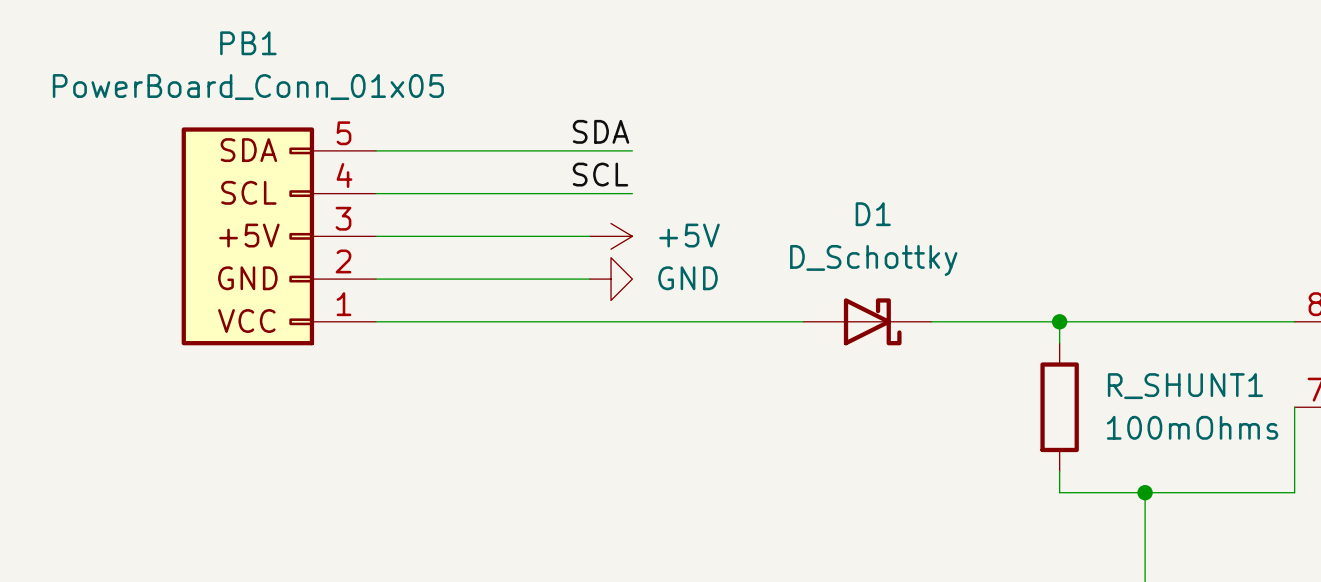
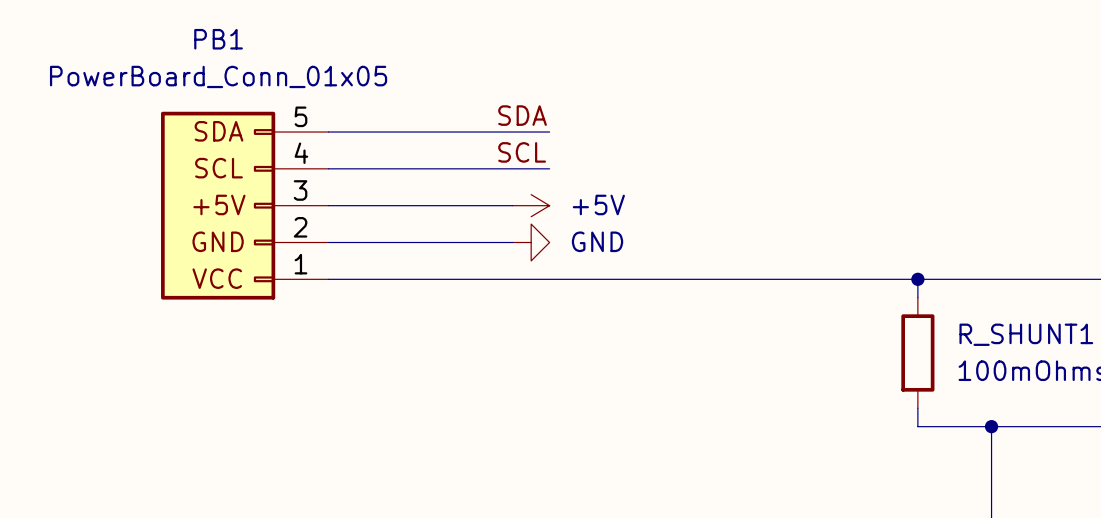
D1: D_Schottky (867, 321) -> none

